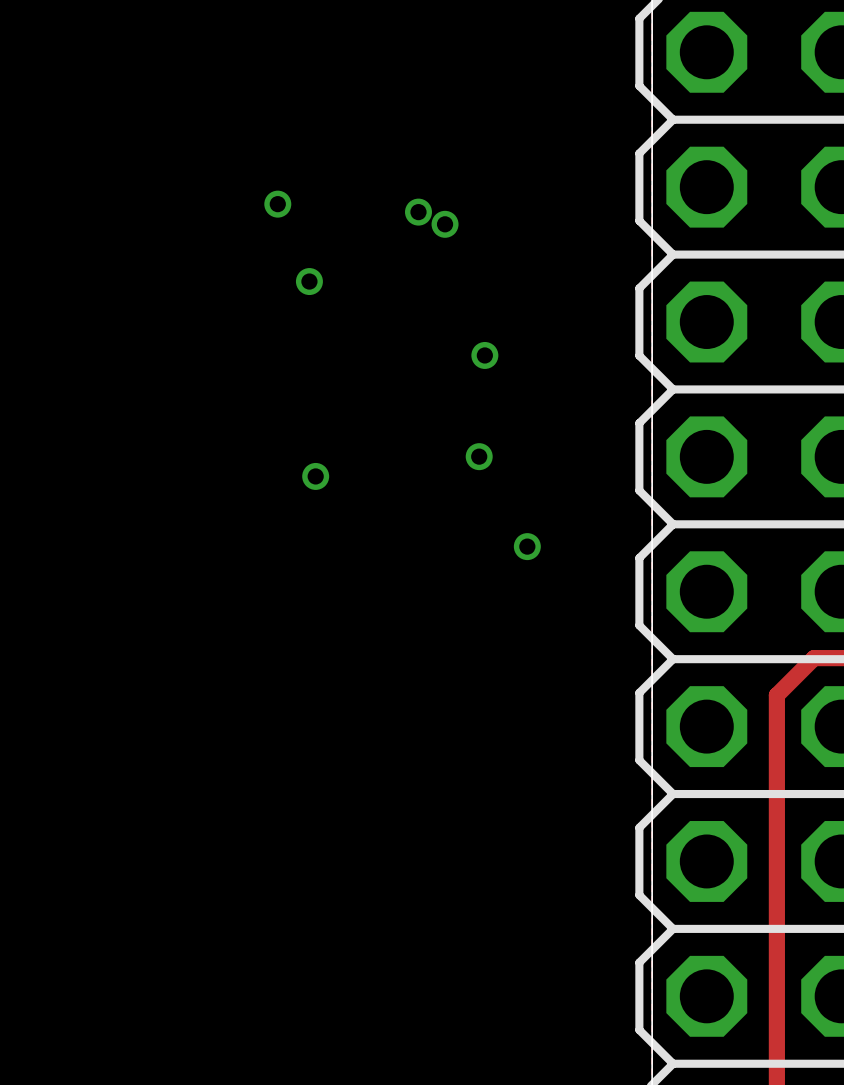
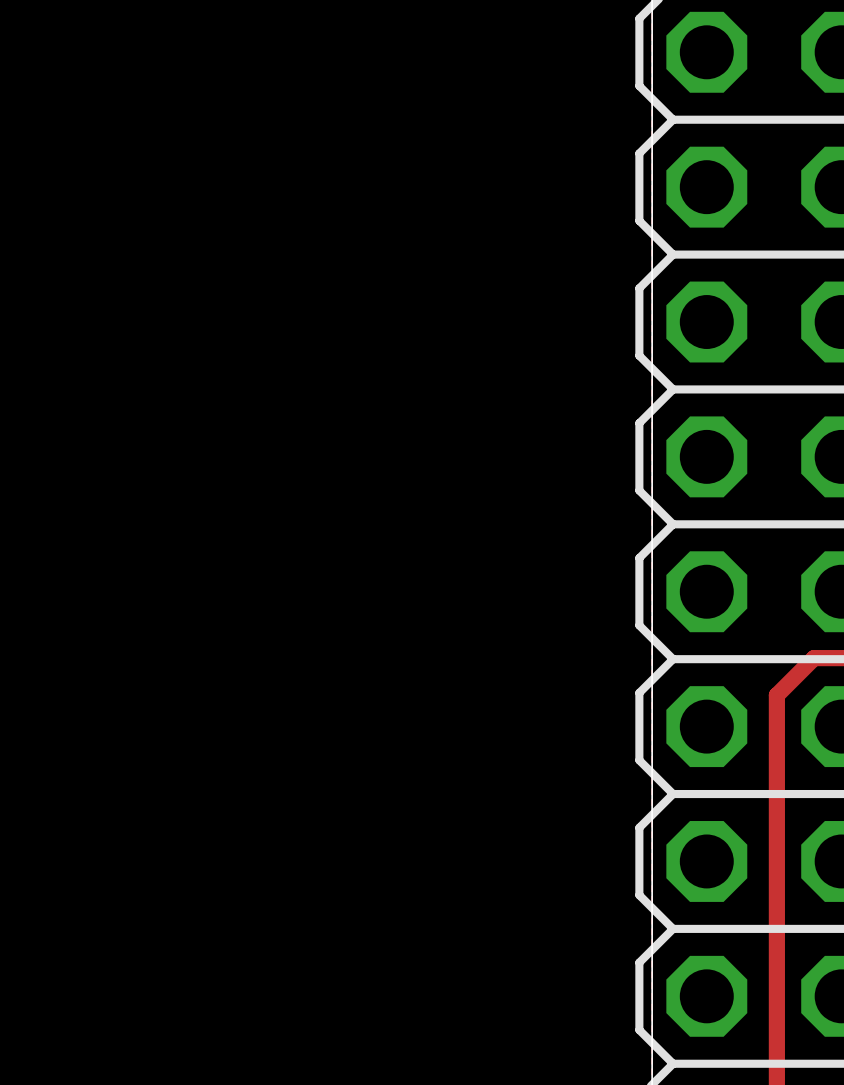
via: (277, 204) -> none
via: (418, 212) -> none
via: (445, 224) -> none
via: (309, 281) -> none
via: (484, 355) -> none
via: (479, 456) -> none
via: (315, 476) -> none
via: (527, 546) -> none

